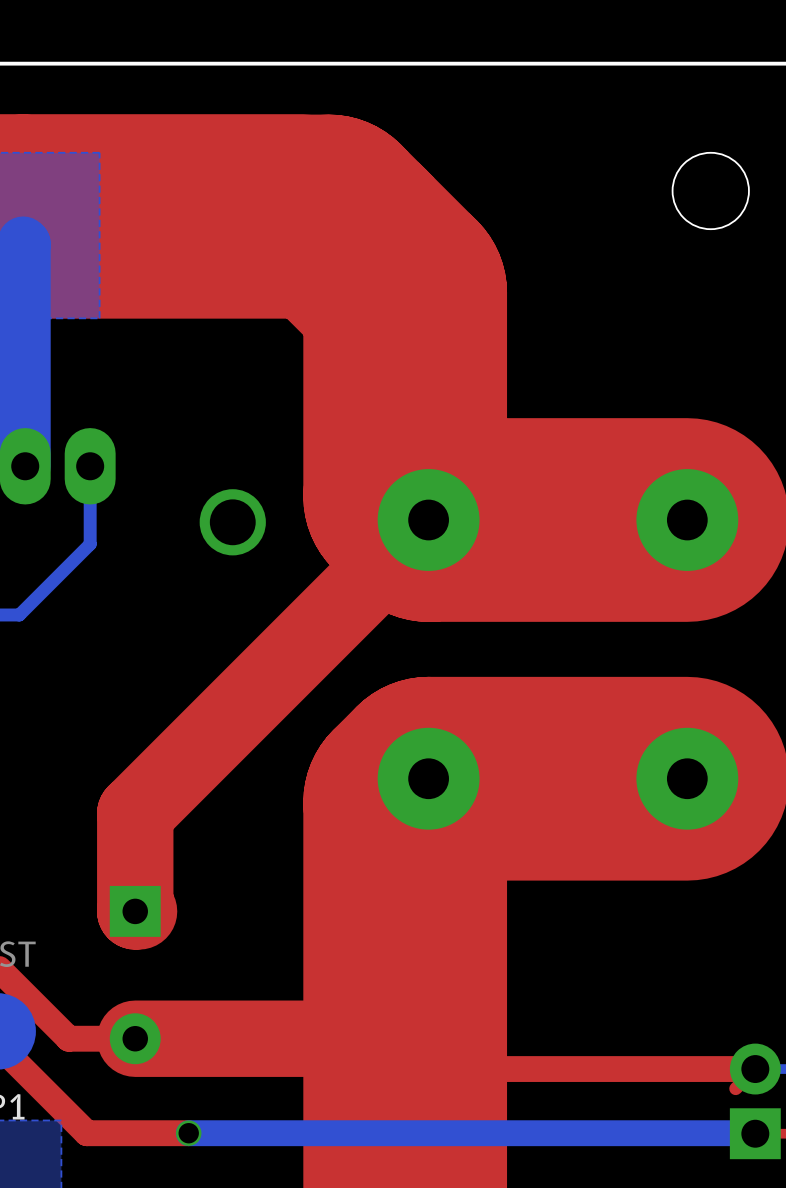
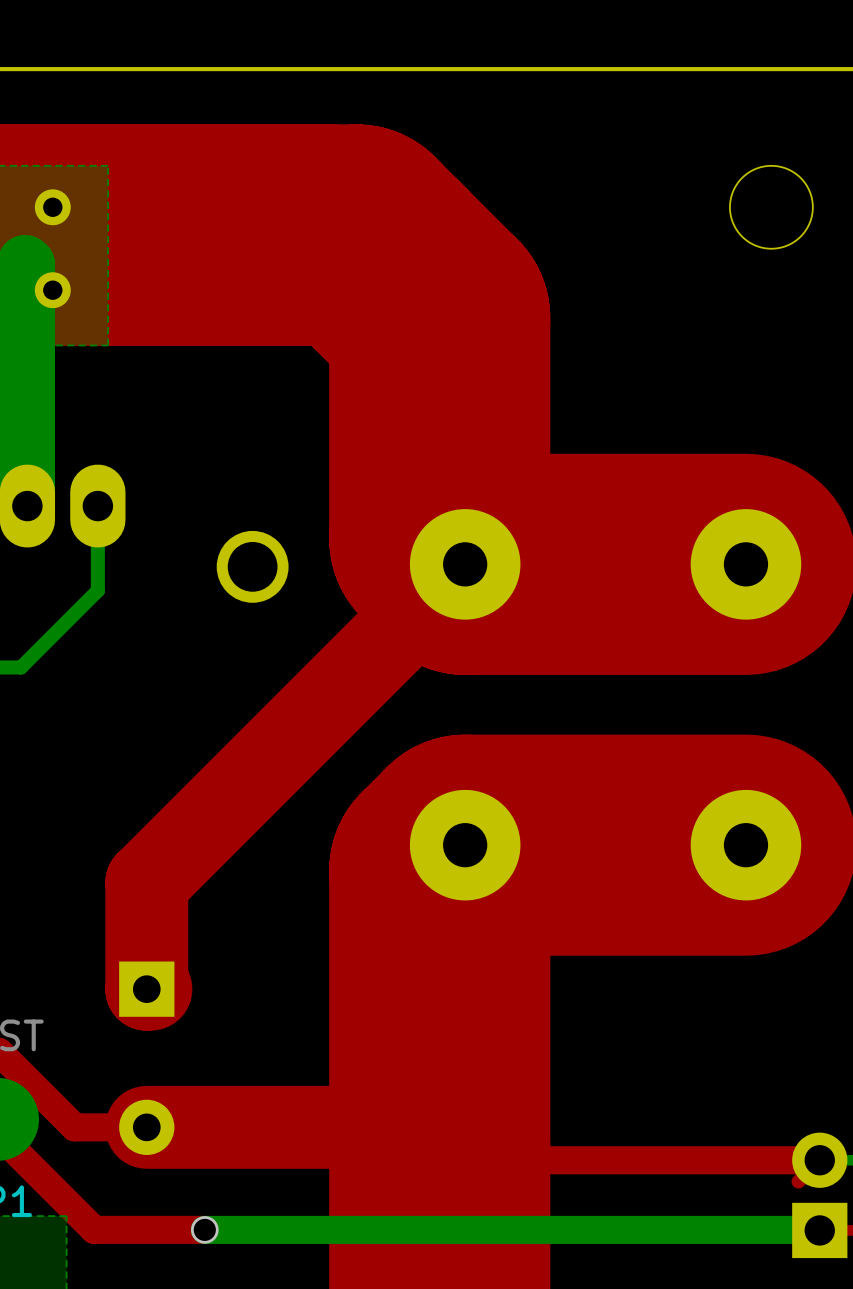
part: none -> (52, 207)
part: none -> (52, 290)

